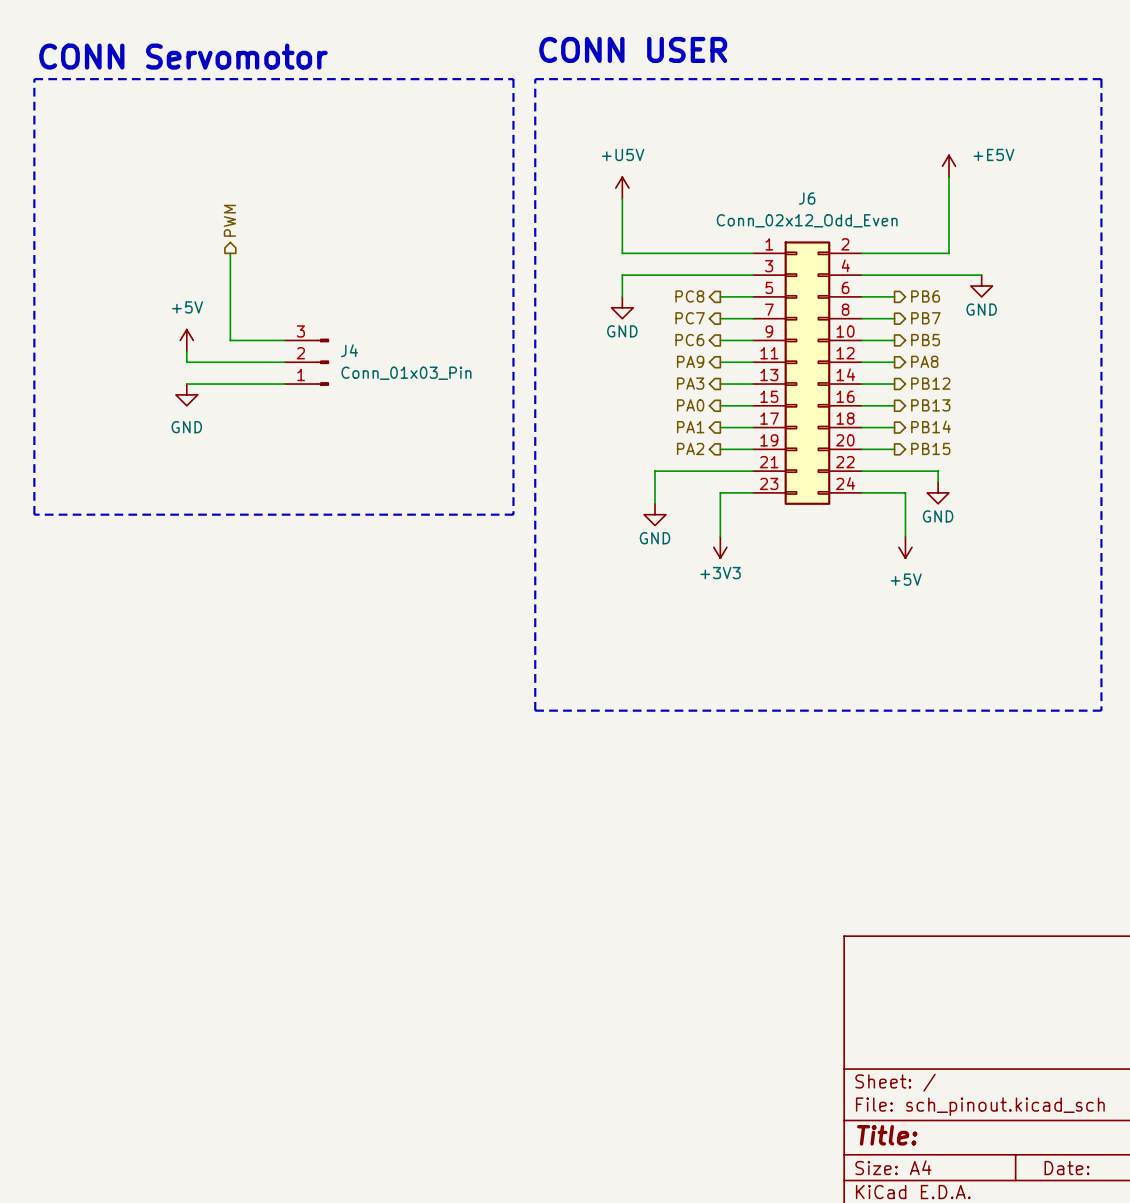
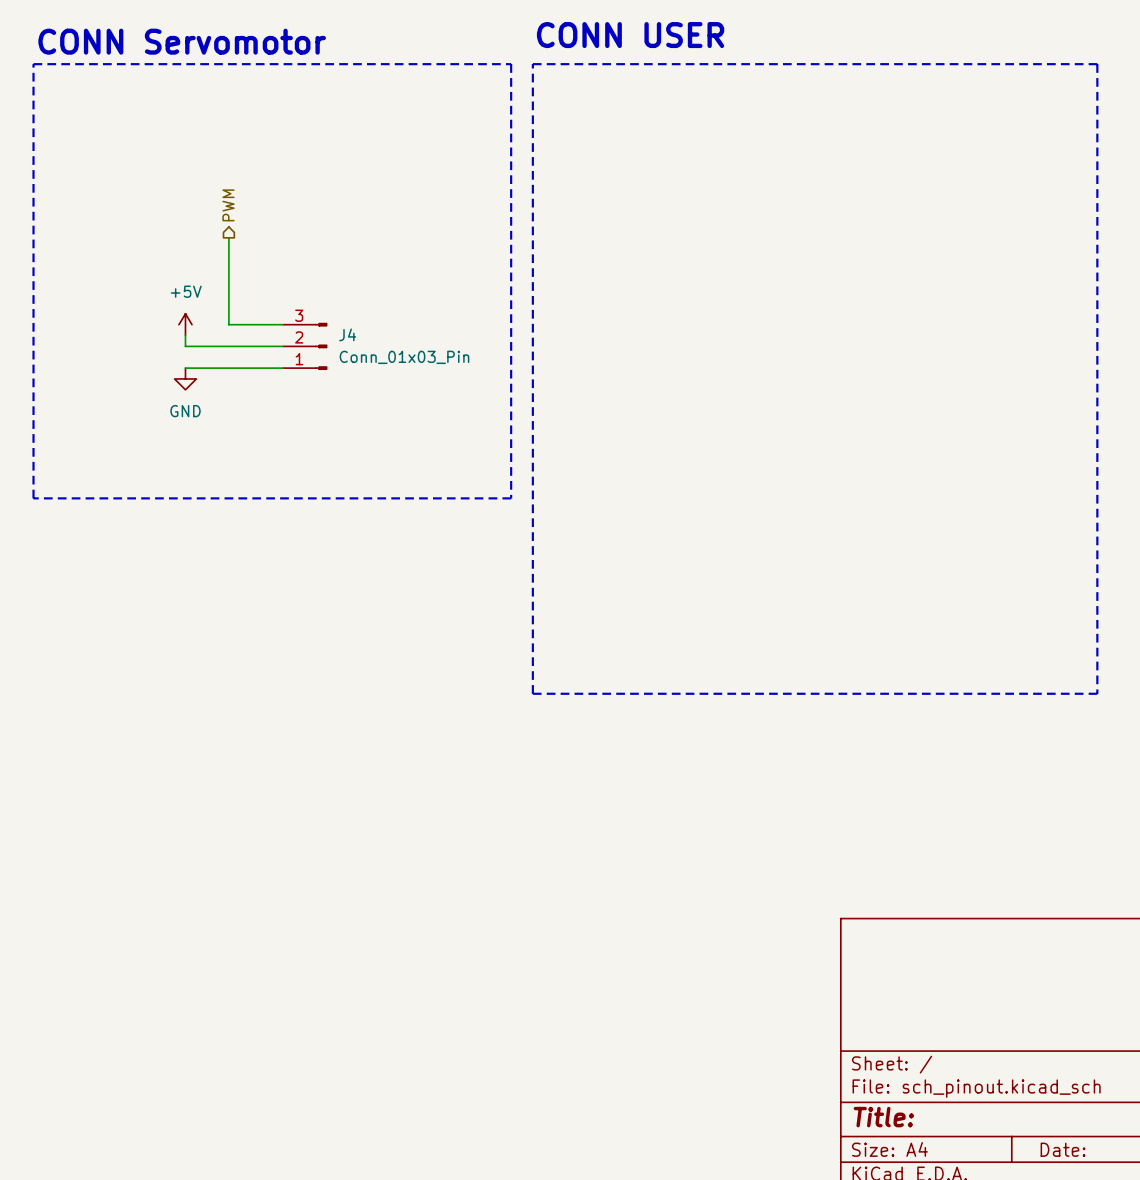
power symbol: +E5V (949, 166) -> none
wire: (949, 177) (949, 253) (861, 253) -> none
power symbol: +U5V (622, 188) -> none
wire: (622, 198) (622, 253) (753, 253) -> none
wire: (753, 275) (622, 275) (622, 296) -> none
wire: (861, 275) (981, 275) -> none
power symbol: GND (981, 286) -> none
hierarchical label: PC8 (689, 296) -> none
wire: (720, 296) (753, 296) -> none
wire: (861, 296) (894, 296) -> none
hierarchical label: PB6 (925, 296) -> none
power symbol: GND (622, 307) -> none
hierarchical label: PC7 (690, 318) -> none
wire: (720, 318) (753, 318) -> none
wire: (861, 318) (894, 318) -> none
hierarchical label: PB7 (925, 318) -> none
hierarchical label: PC6 (689, 340) -> none
wire: (720, 340) (753, 340) -> none
wire: (861, 340) (894, 340) -> none
hierarchical label: PB5 (925, 340) -> none
hierarchical label: PA9 (690, 361) -> none
hierarchical label: PA8 (924, 361) -> none
wire: (720, 362) (753, 362) -> none
wire: (861, 362) (894, 362) -> none
J6: Conn_02x12_Odd_Even (807, 373) -> none
hierarchical label: PA3 (690, 383) -> none
hierarchical label: PB12 (930, 383) -> none
wire: (720, 384) (753, 384) -> none
wire: (861, 384) (894, 384) -> none
hierarchical label: PA0 (690, 405) -> none
wire: (720, 405) (753, 405) -> none
wire: (861, 405) (894, 405) -> none
hierarchical label: PB13 (930, 405) -> none
hierarchical label: PB14 (931, 426) -> none
hierarchical label: PA1 (690, 427) -> none
wire: (720, 427) (753, 427) -> none
wire: (861, 427) (894, 427) -> none
hierarchical label: PA2 (690, 448) -> none
hierarchical label: PB15 (930, 448) -> none
wire: (720, 449) (753, 449) -> none
wire: (861, 449) (894, 449) -> none
wire: (753, 471) (655, 471) (655, 503) -> none
wire: (861, 471) (938, 471) (938, 482) -> none
wire: (753, 492) (720, 492) (720, 536) -> none
wire: (861, 492) (905, 492) (905, 536) -> none
power symbol: GND (938, 492) -> none
power symbol: GND (655, 514) -> none
power symbol: +3V3 (720, 547) -> none
power symbol: +5V (905, 547) -> none

